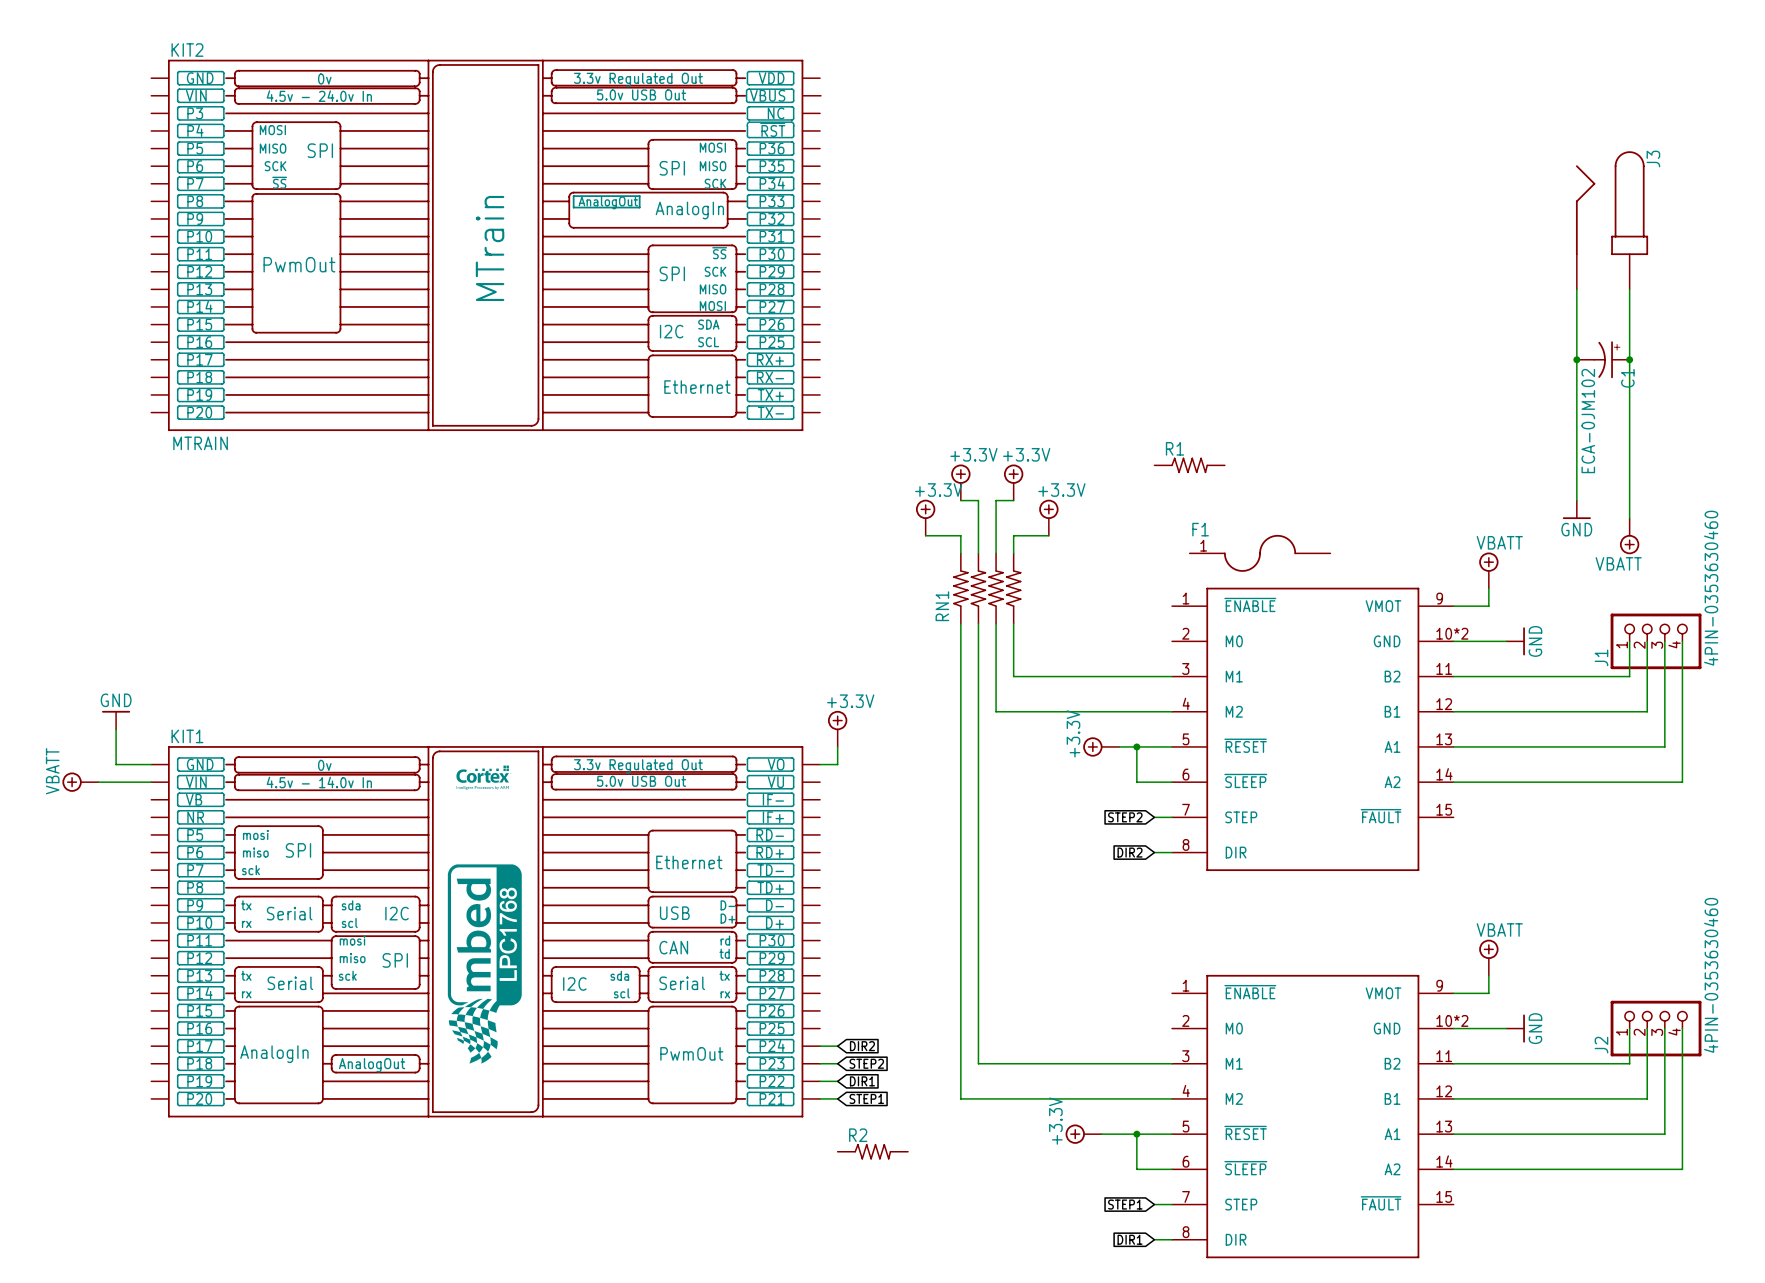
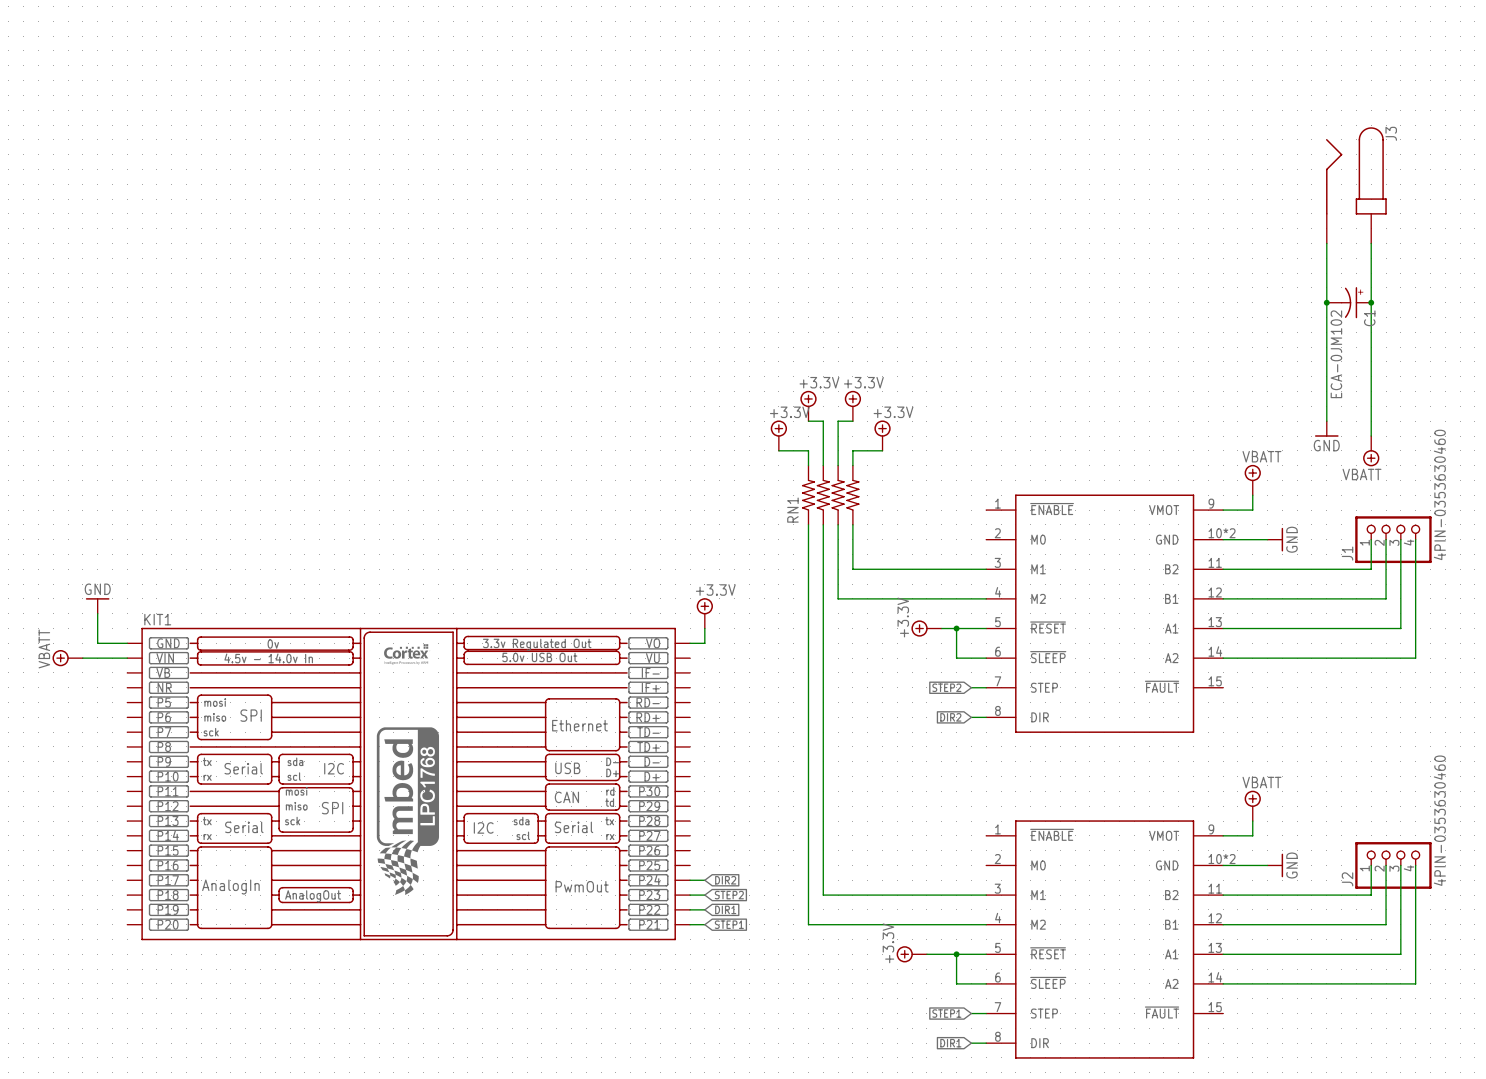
KIT2: MTRAIN (486, 245) -> none
R1: (1189, 465) -> none
F1: (1260, 553) -> none
R2: (872, 1151) -> none

